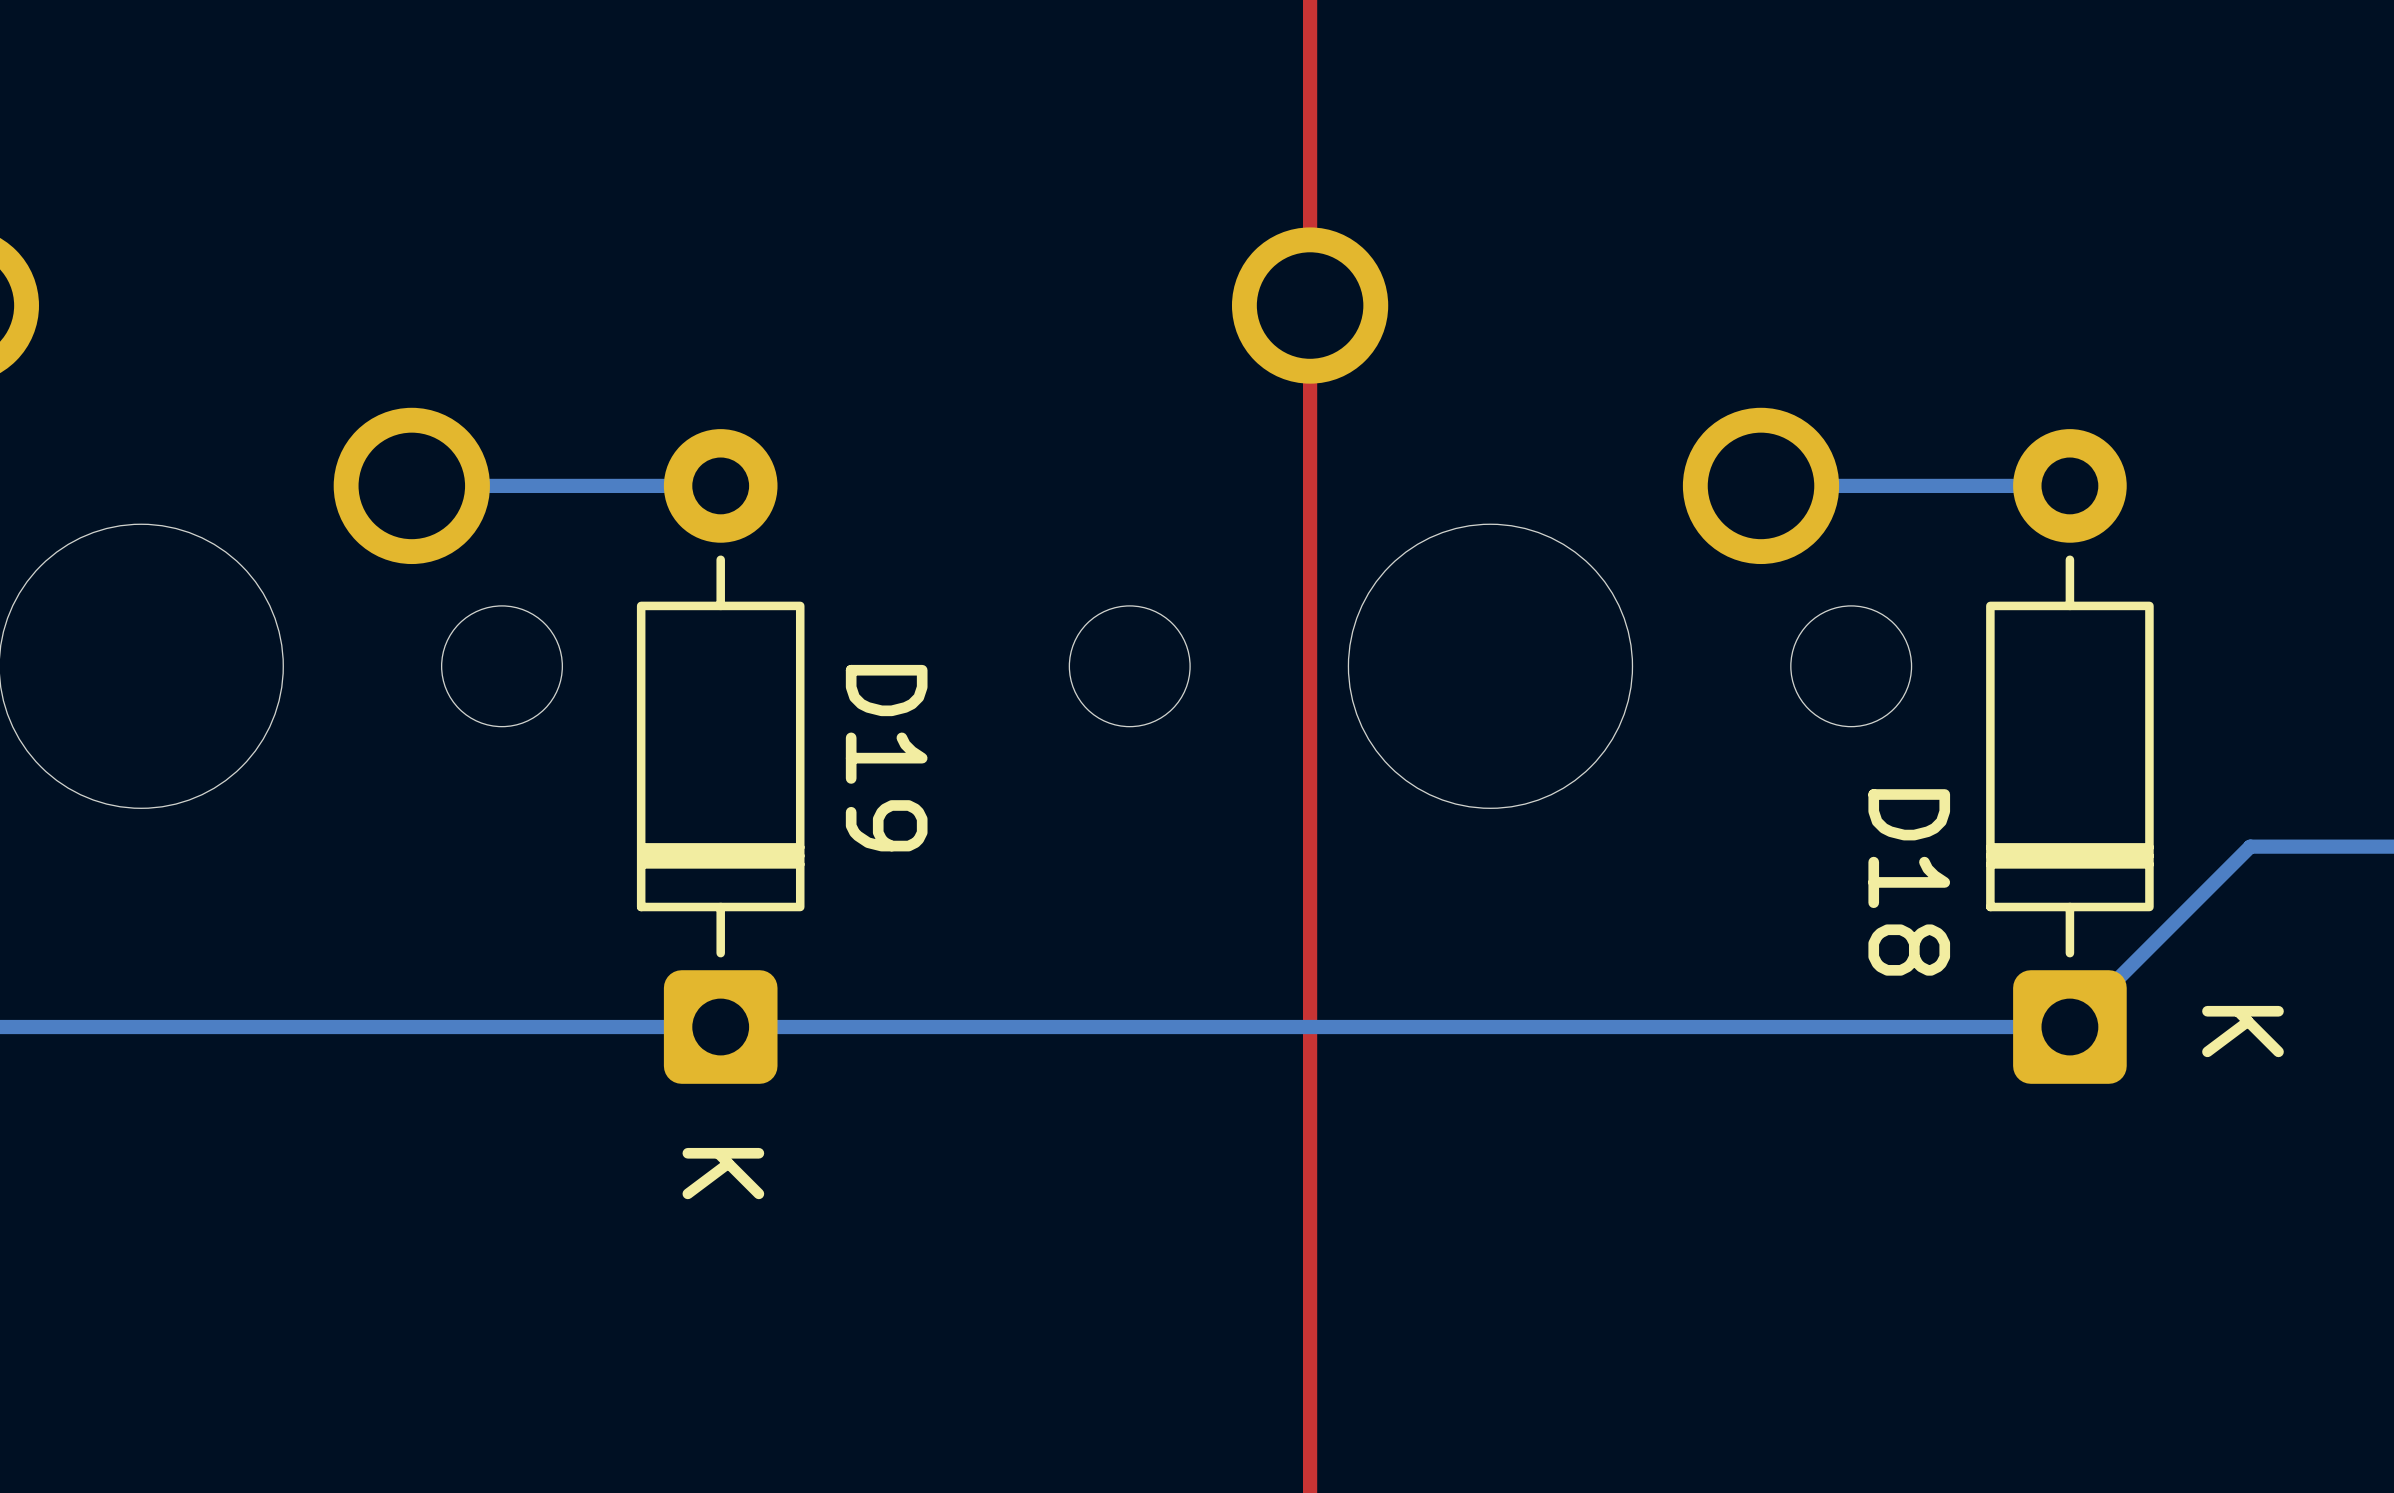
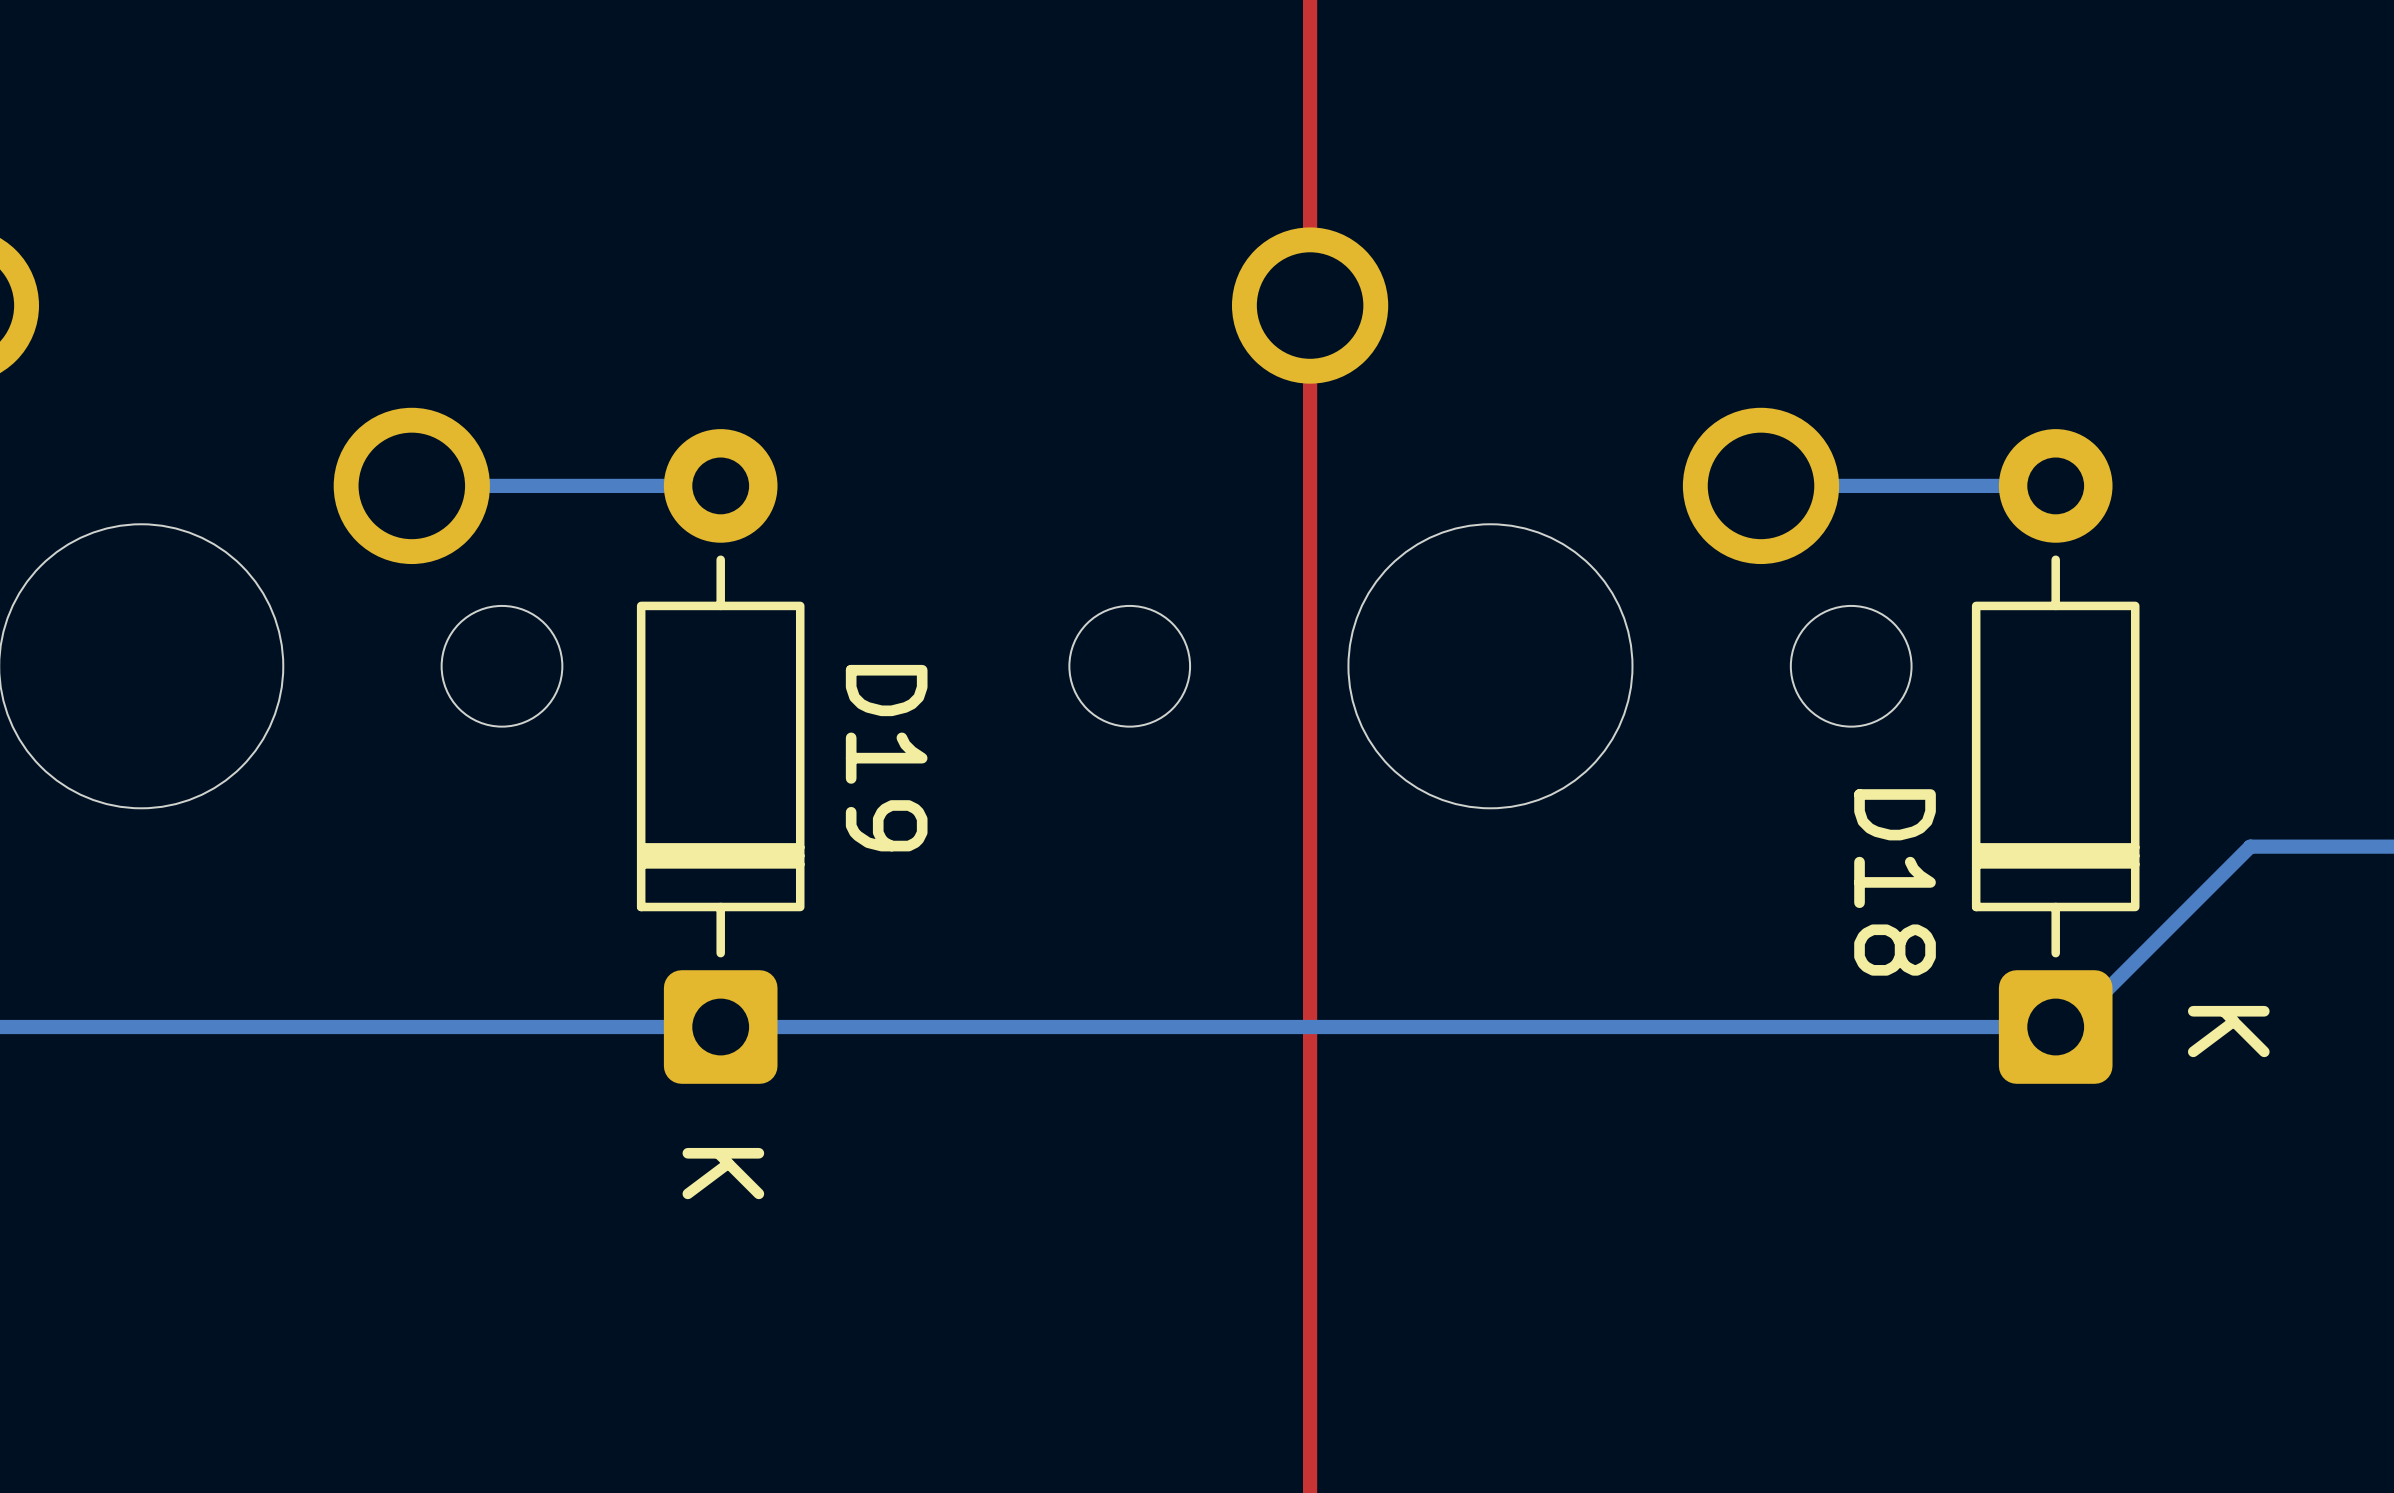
D18 position: (2069, 756) -> (2055, 756)

